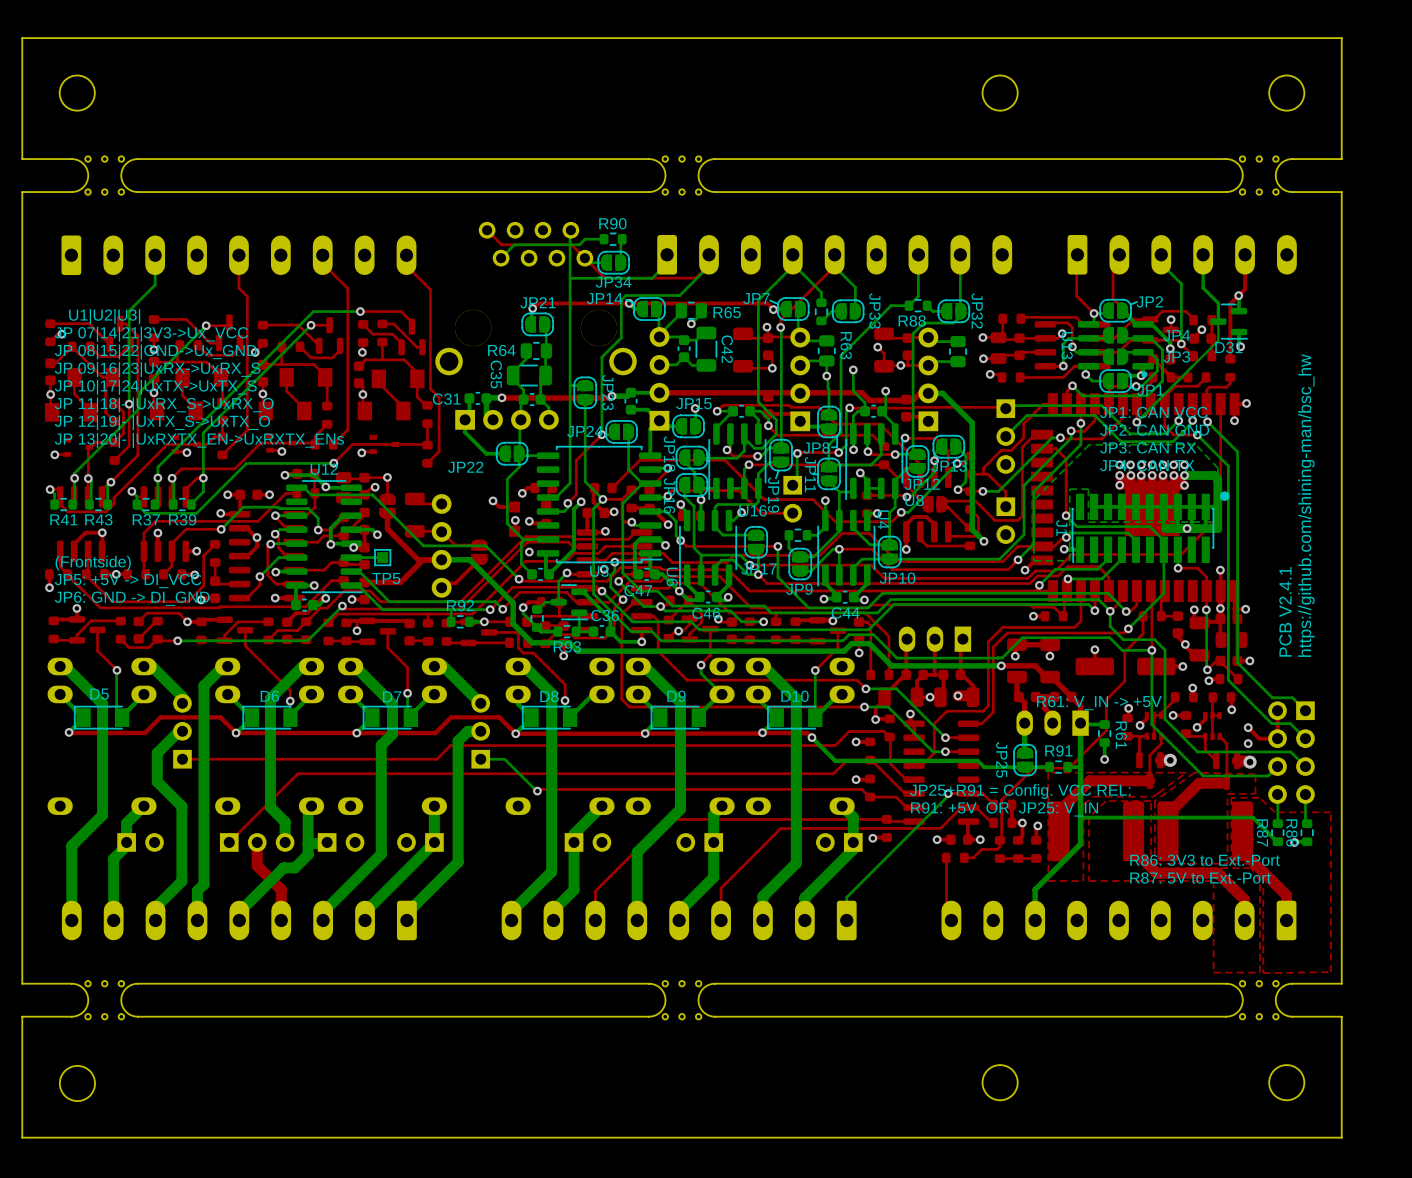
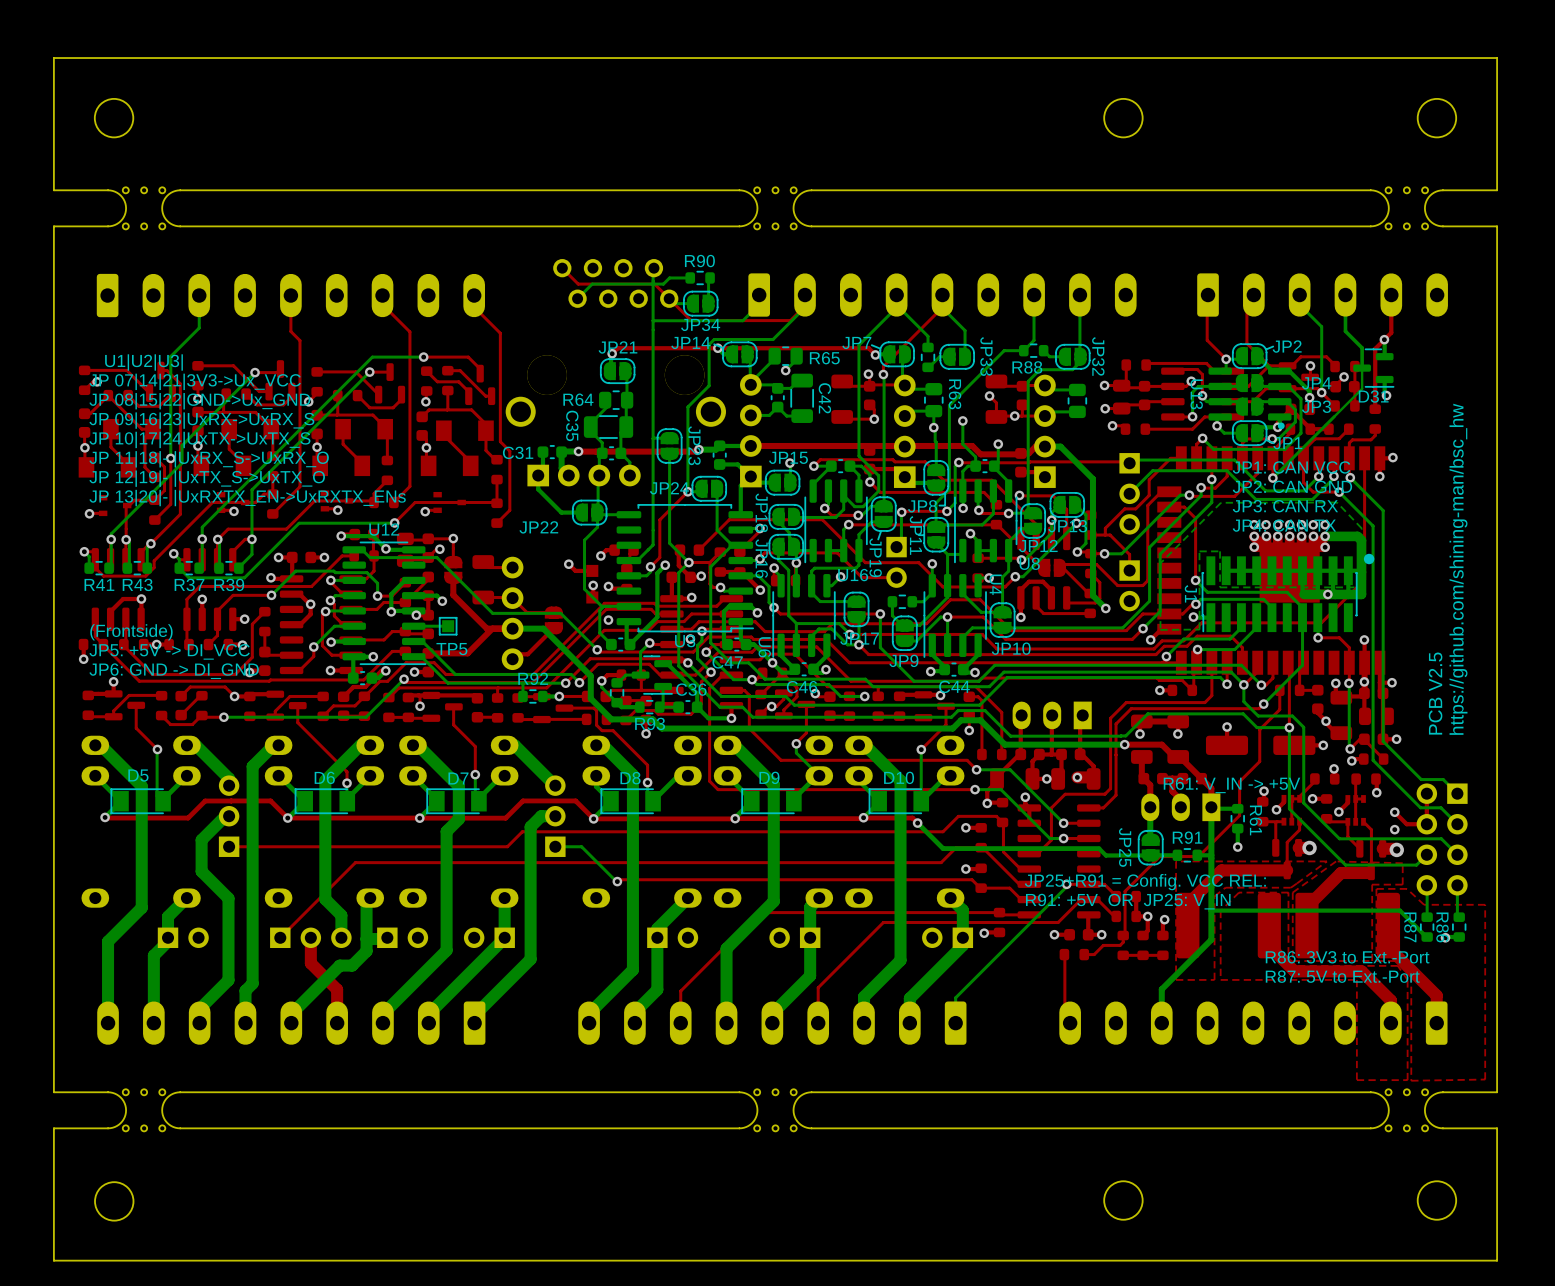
text: PCB V2.4.1 (1285, 611) -> PCB V2.5 (1435, 693)

